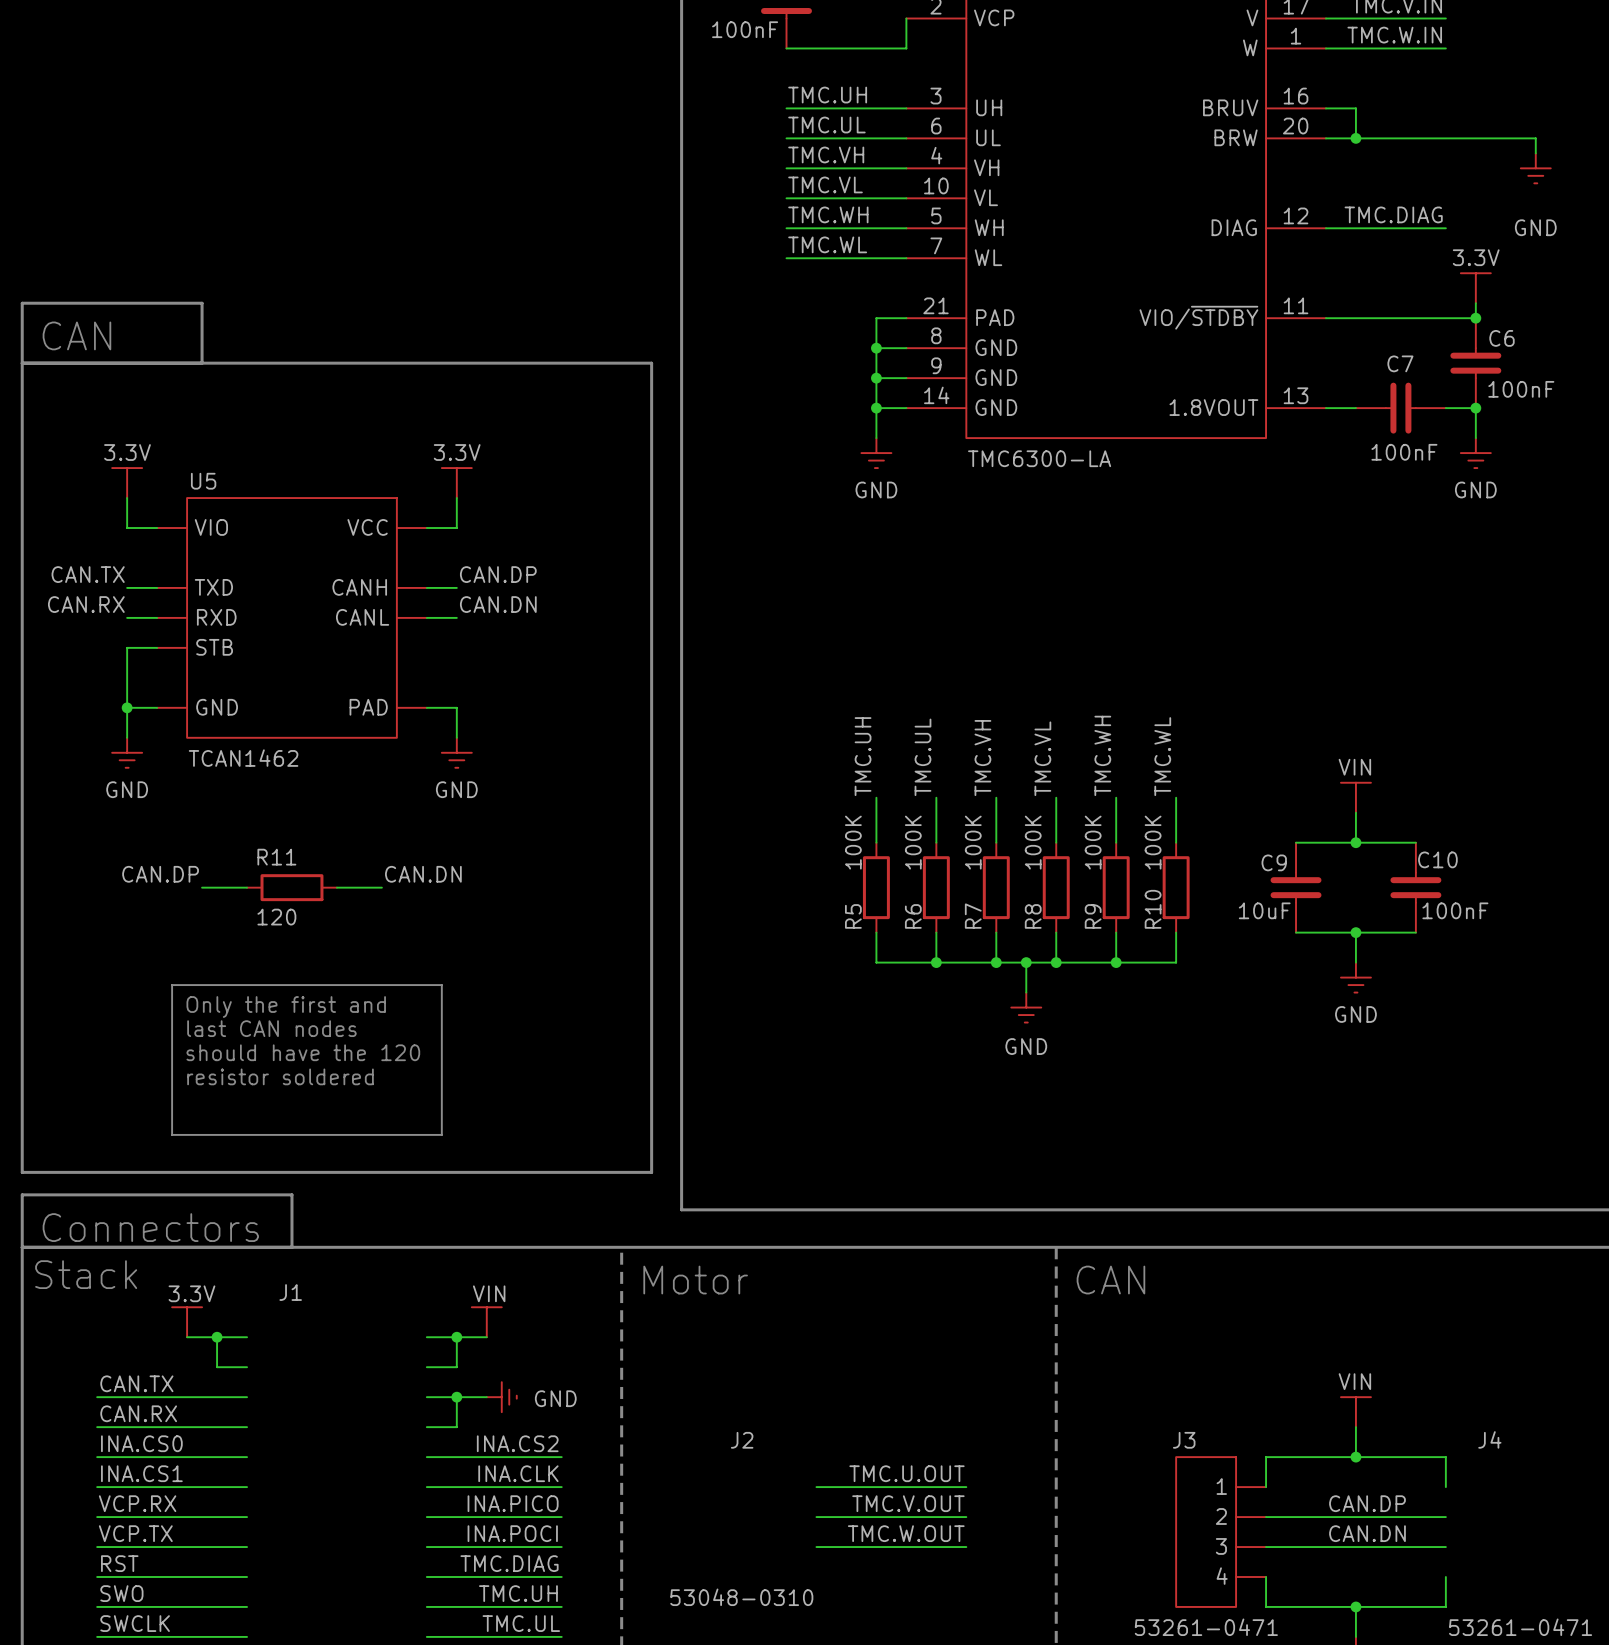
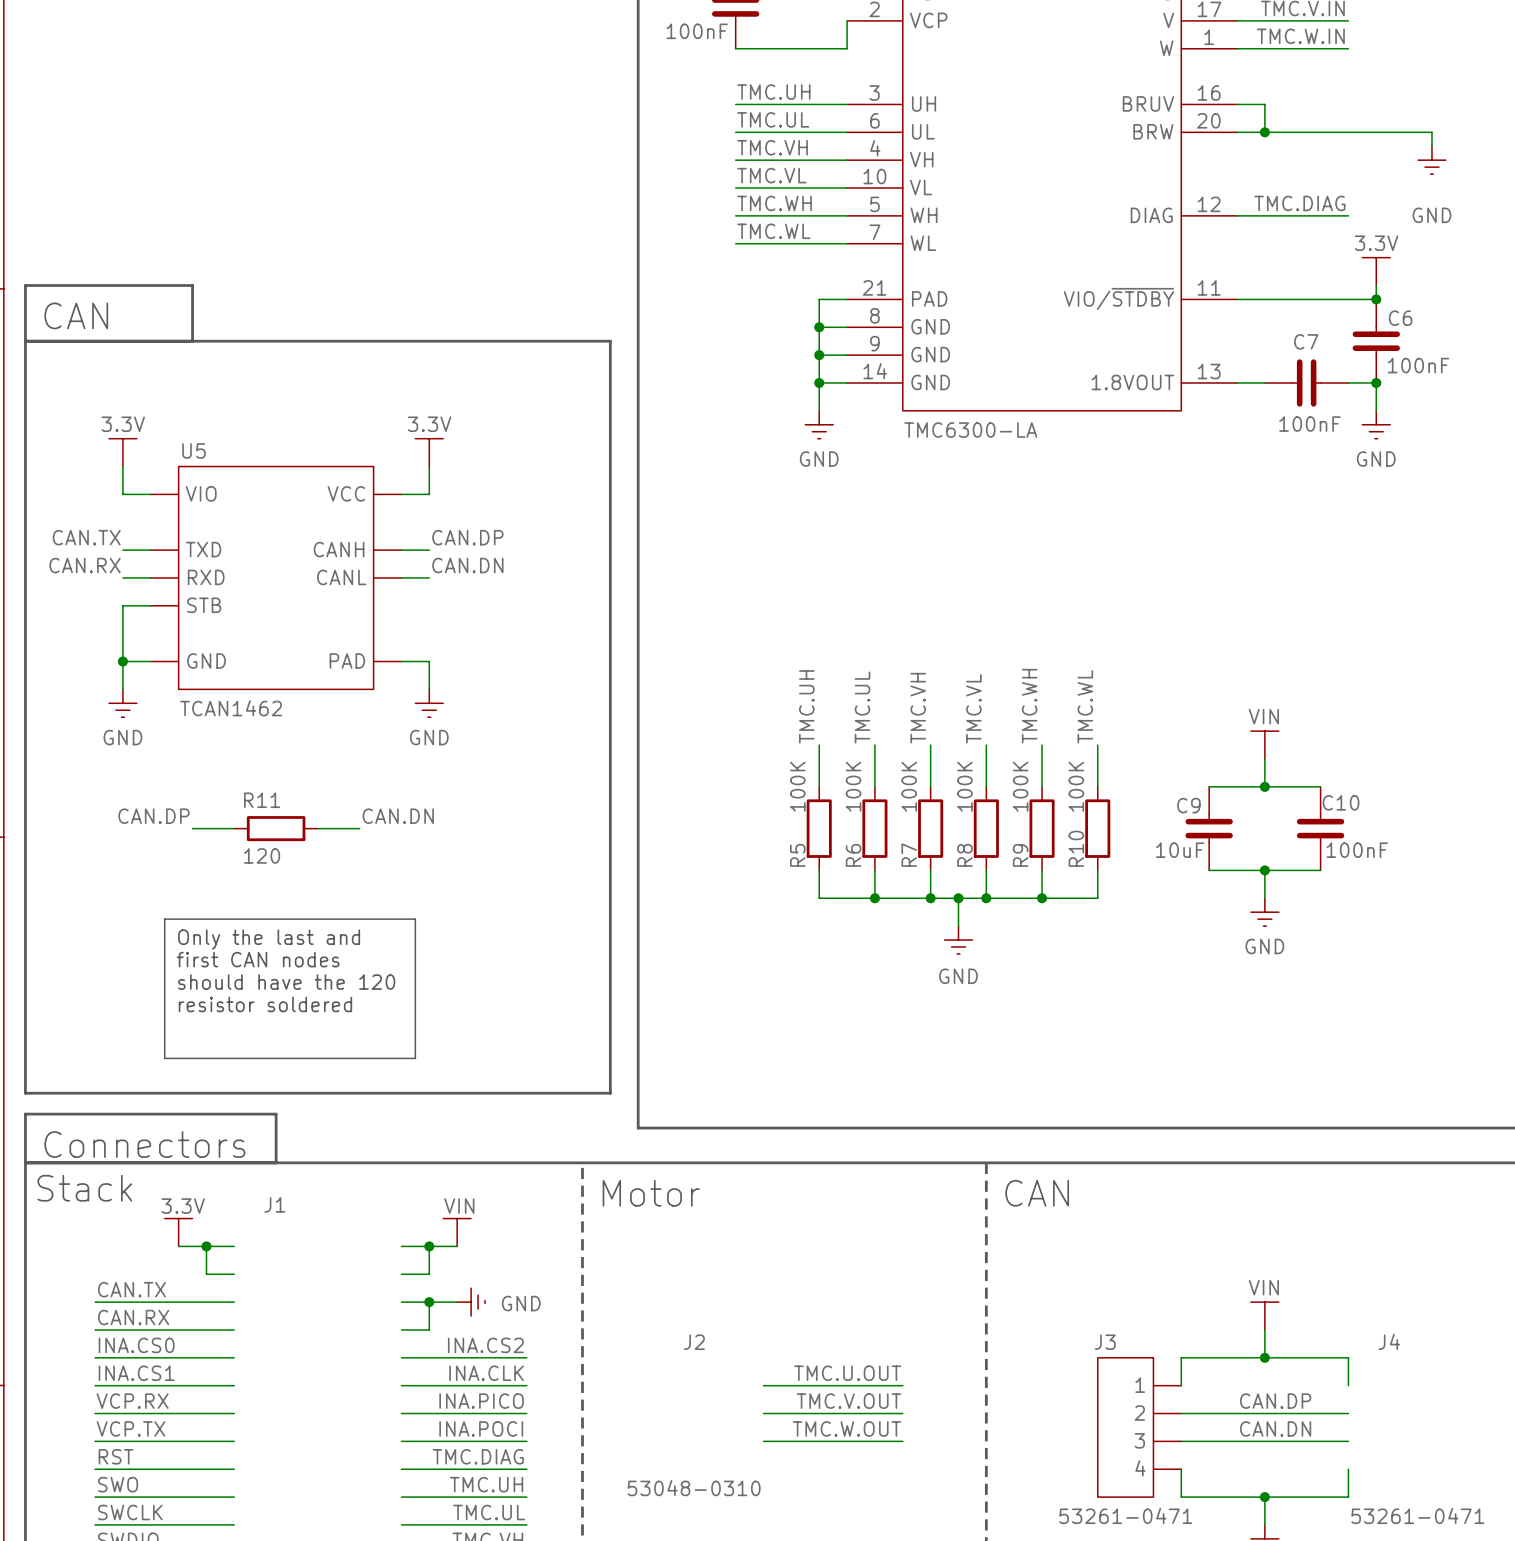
text: Only the first and (286, 1007) -> Only the last and (269, 939)
text: last CAN nodes (271, 1028) -> first CAN nodes (258, 959)

